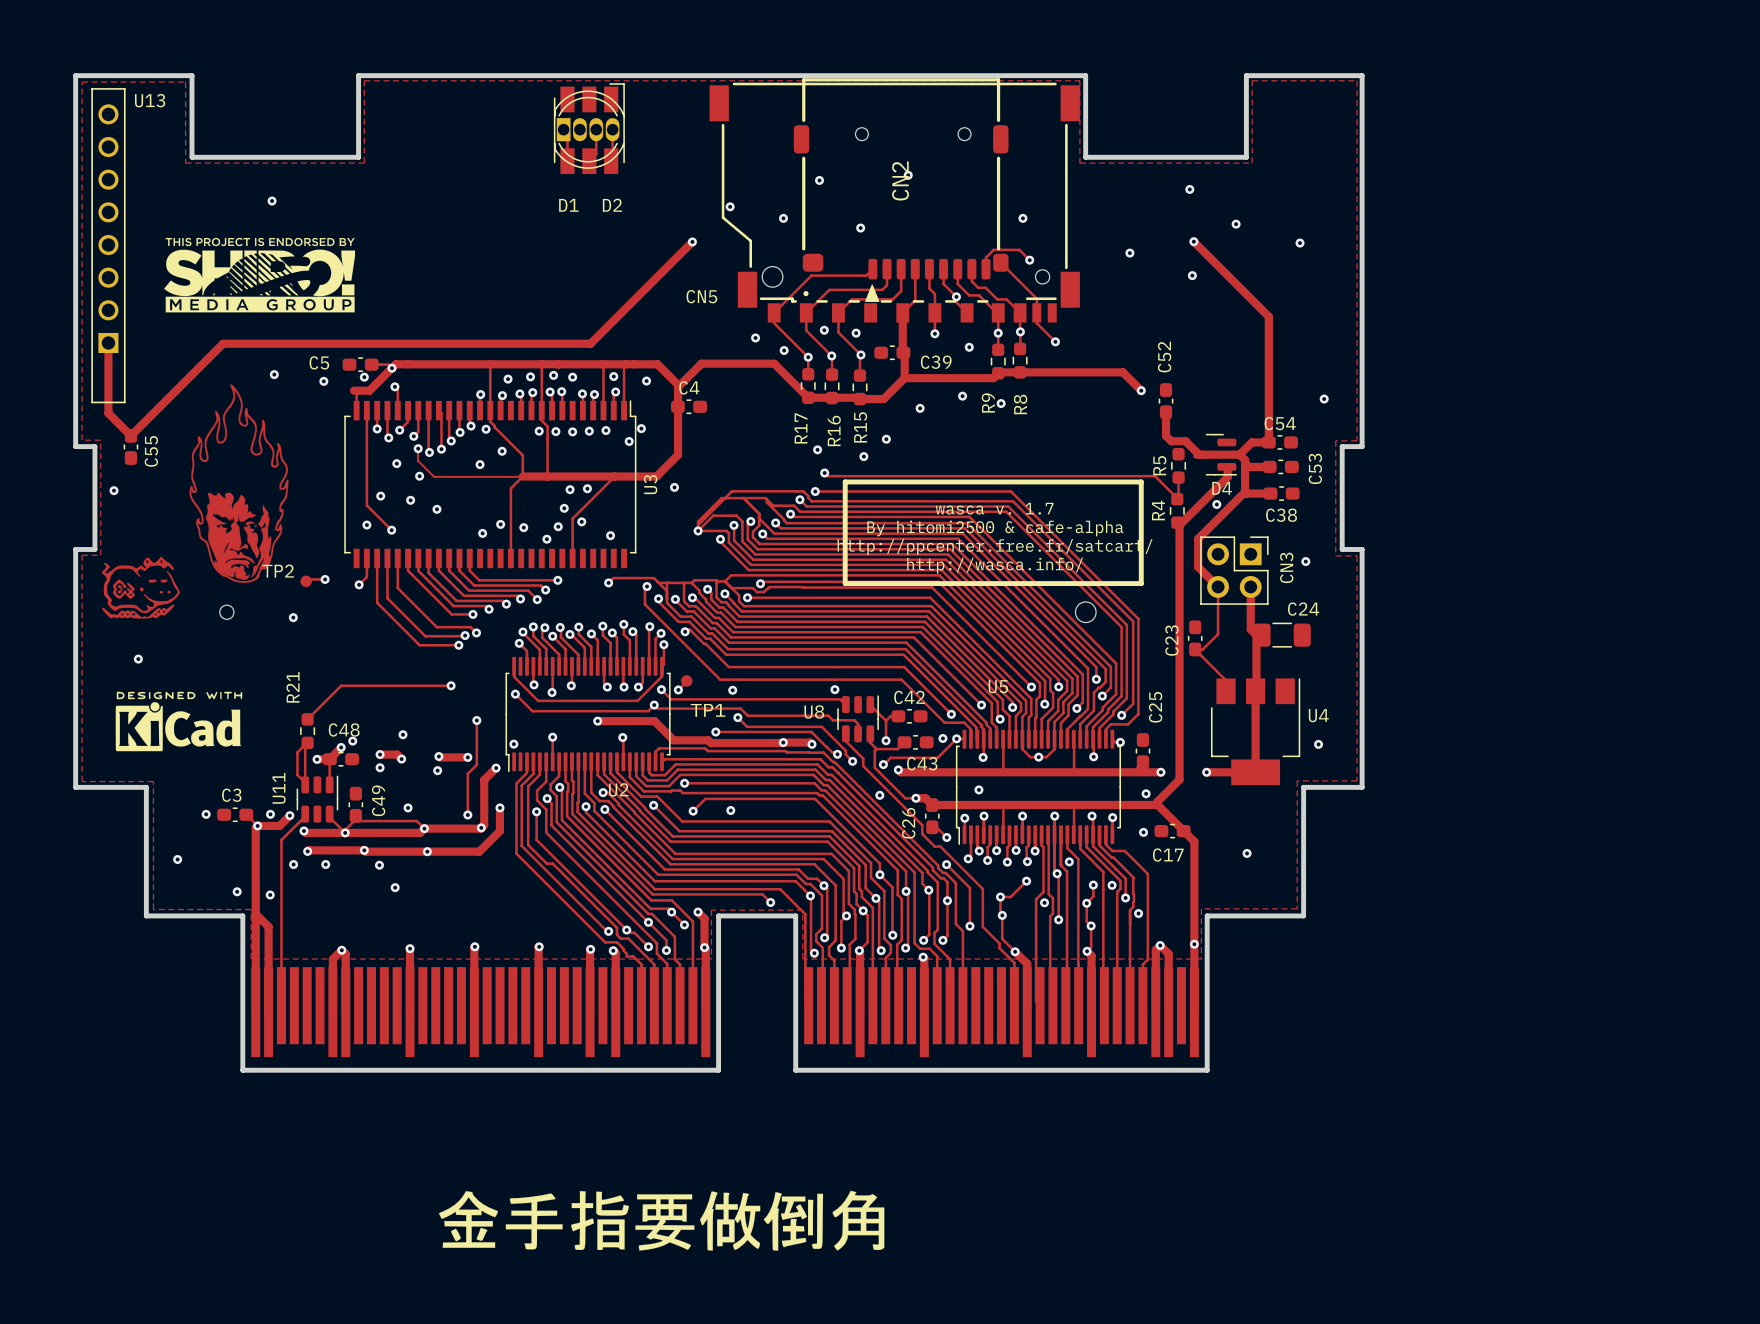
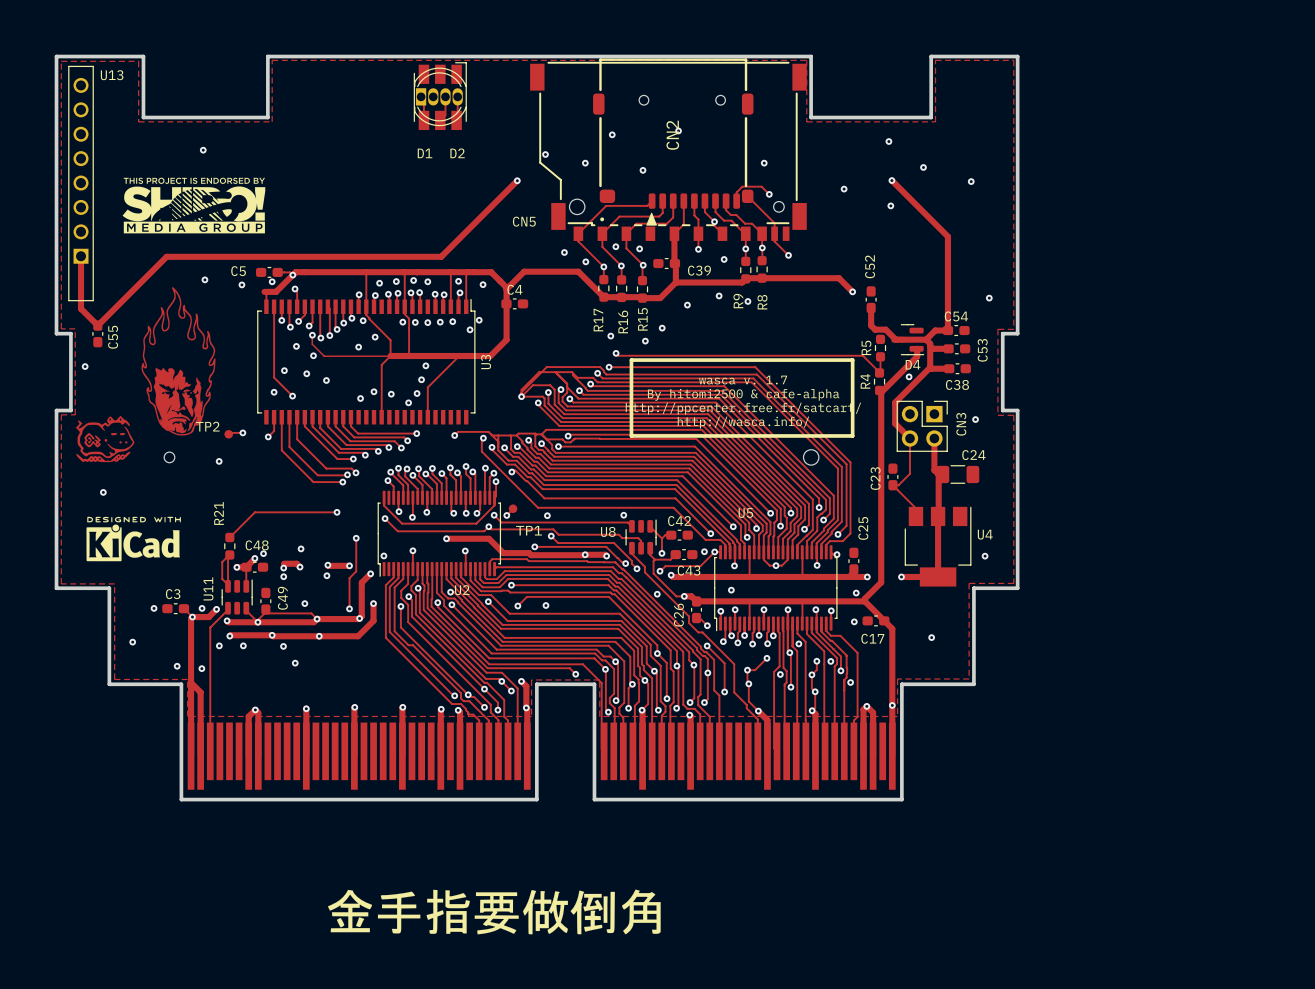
via: (674, 487) -> none
via: (587, 488) -> none
via: (581, 521) -> none
via: (610, 535) -> none
via: (380, 754) -> none
via: none -> (283, 568)
via: (380, 767) -> none
via: none -> (283, 576)

